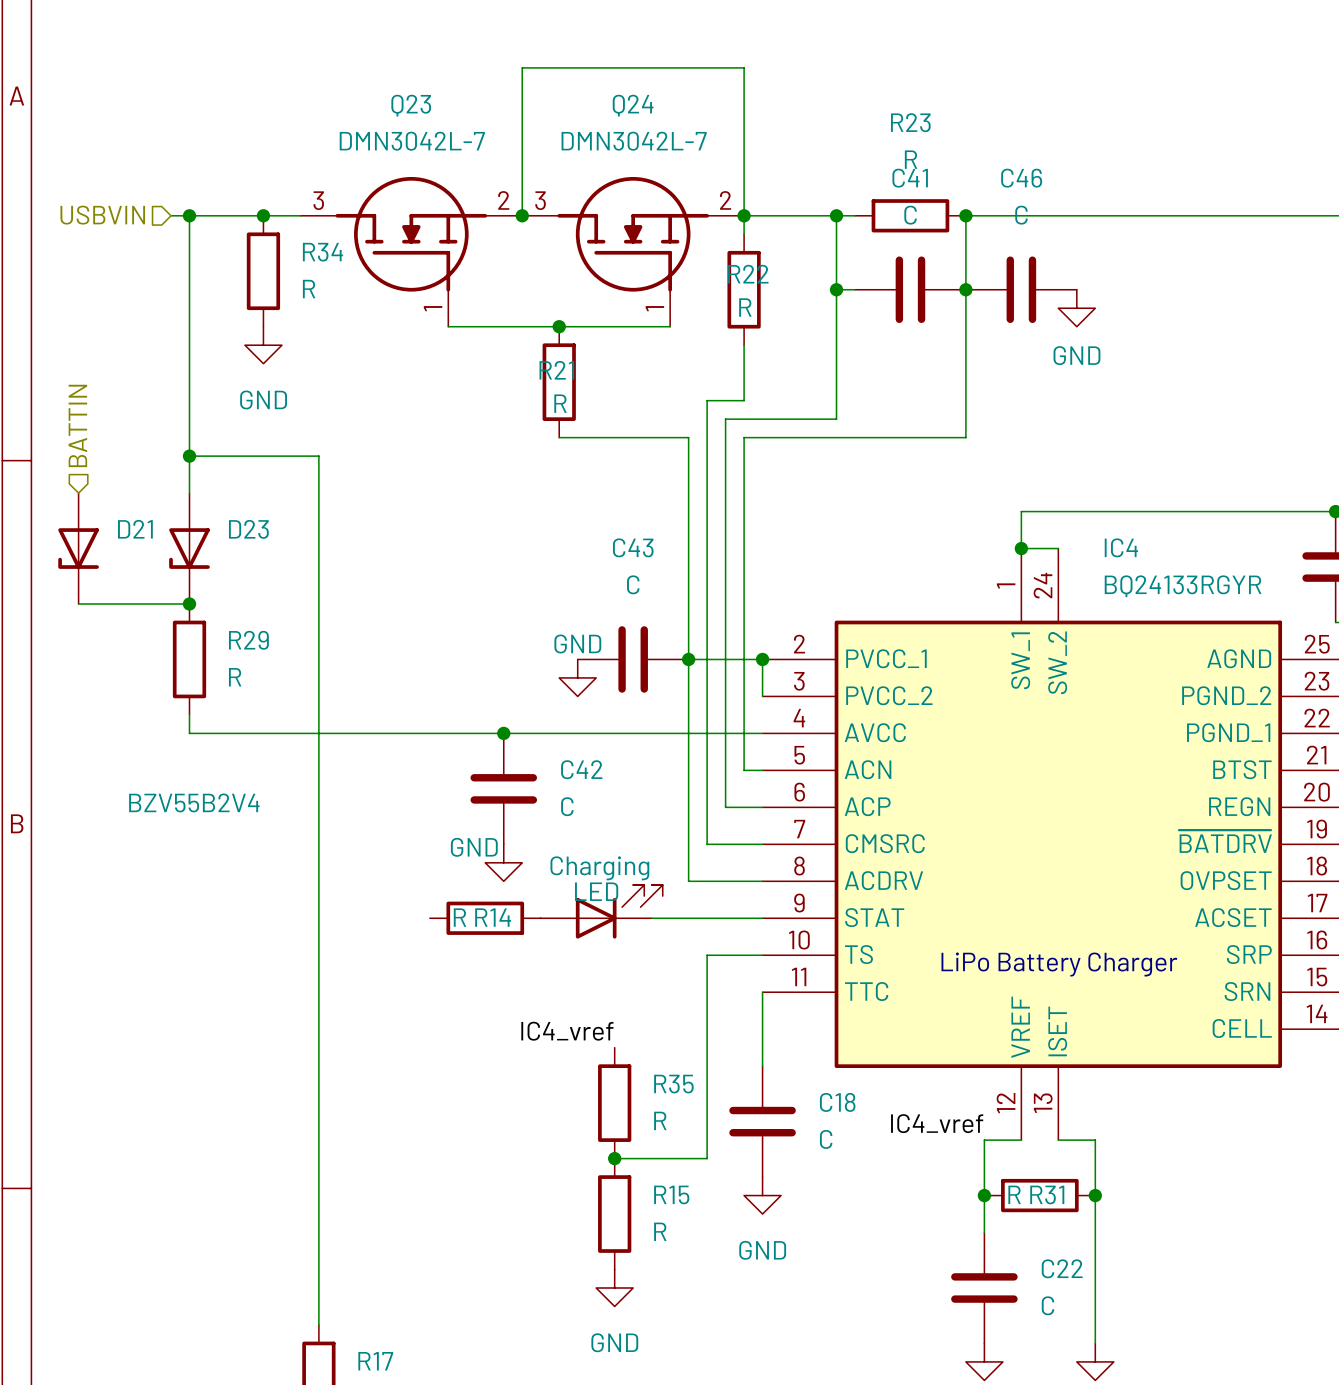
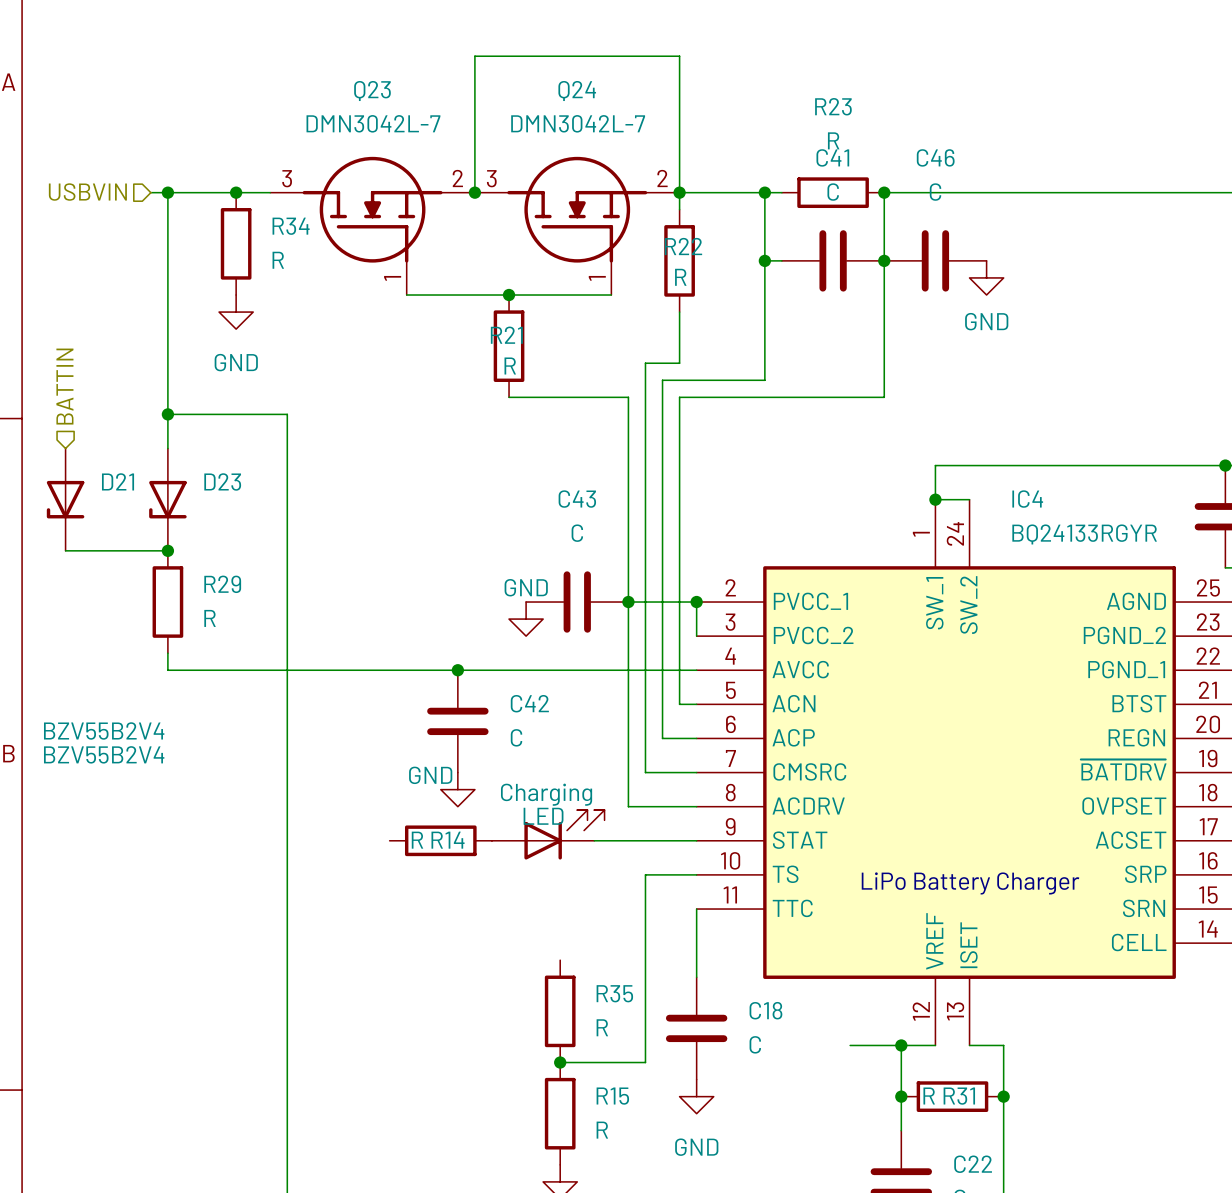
D23 value position: BZV55B2V4 (194, 802) -> BZV55B2V4 (104, 730)
D21 value: none -> BZV55B2V4 (104, 754)
label: IC4_vref (567, 1031) -> none
label: IC4_vref (937, 1123) -> none
wire: none -> (850, 1045) (901, 1045)
junction: none -> (901, 1045)

